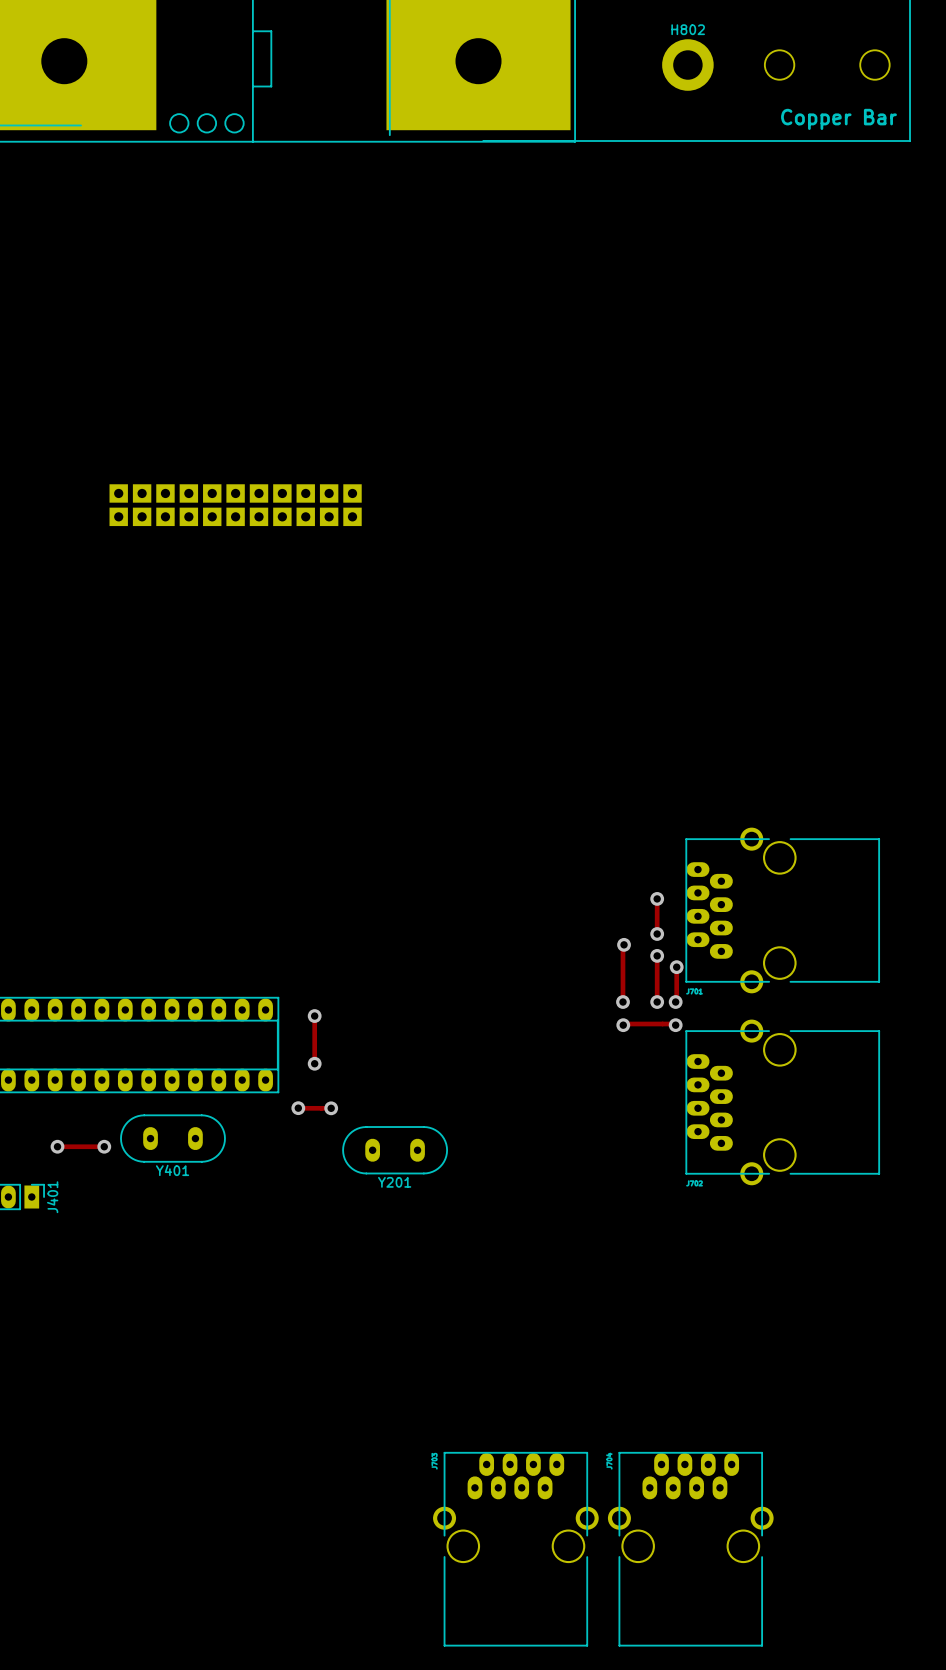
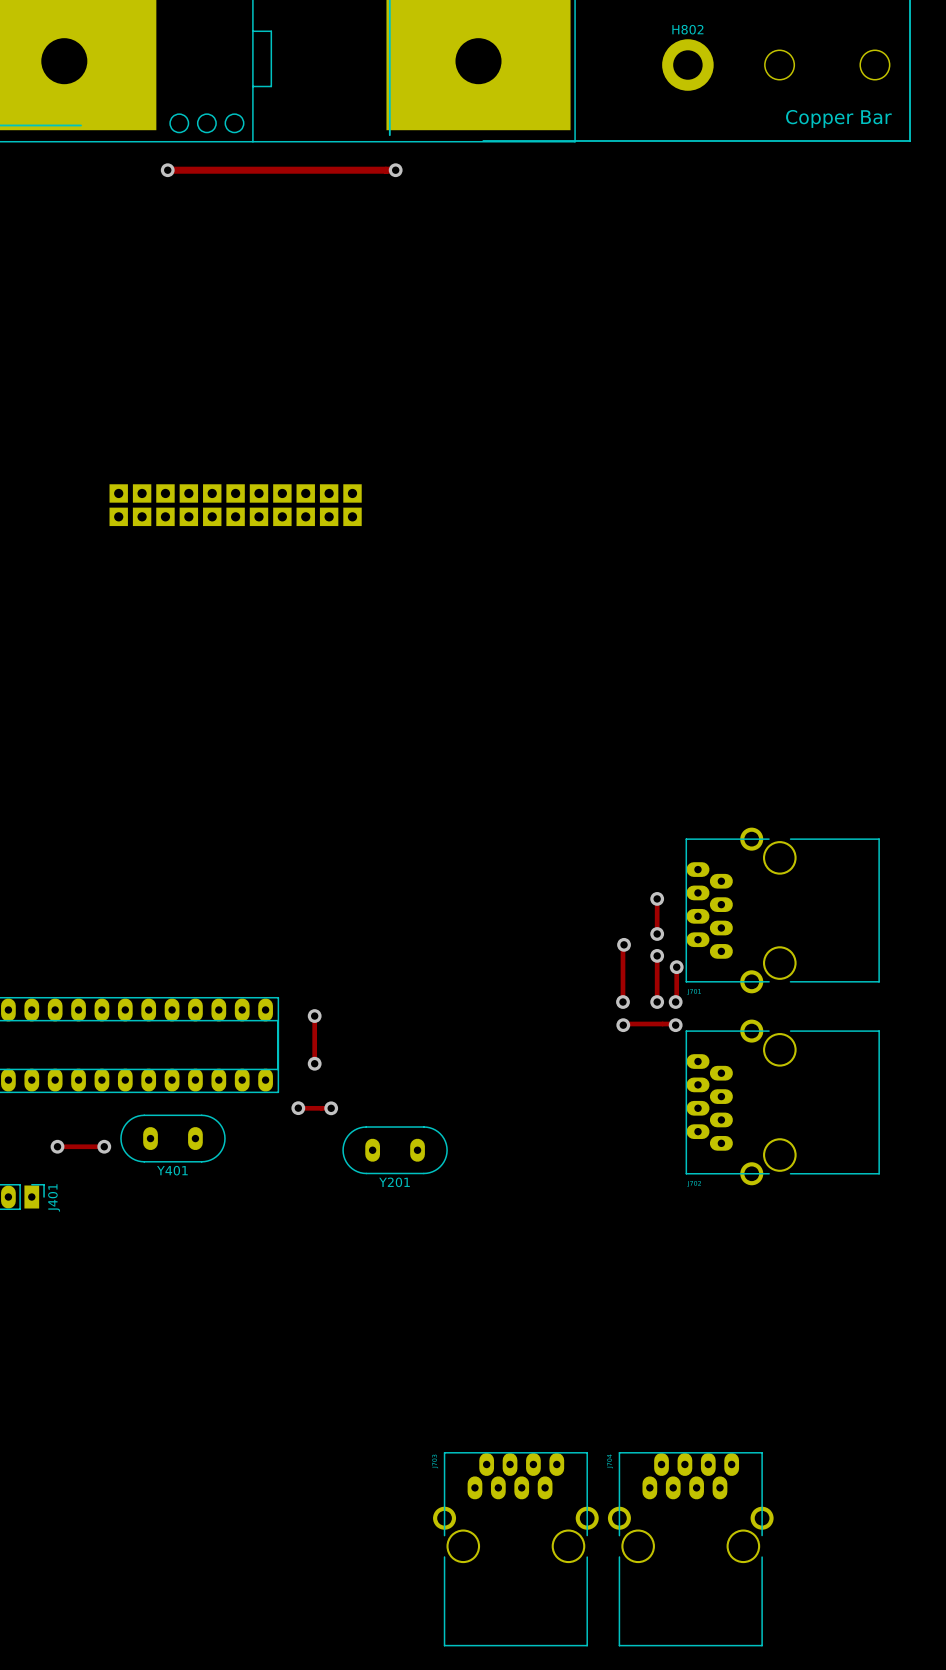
track: none -> (167, 170) (395, 170)
via: none -> (167, 170)
via: none -> (395, 170)

